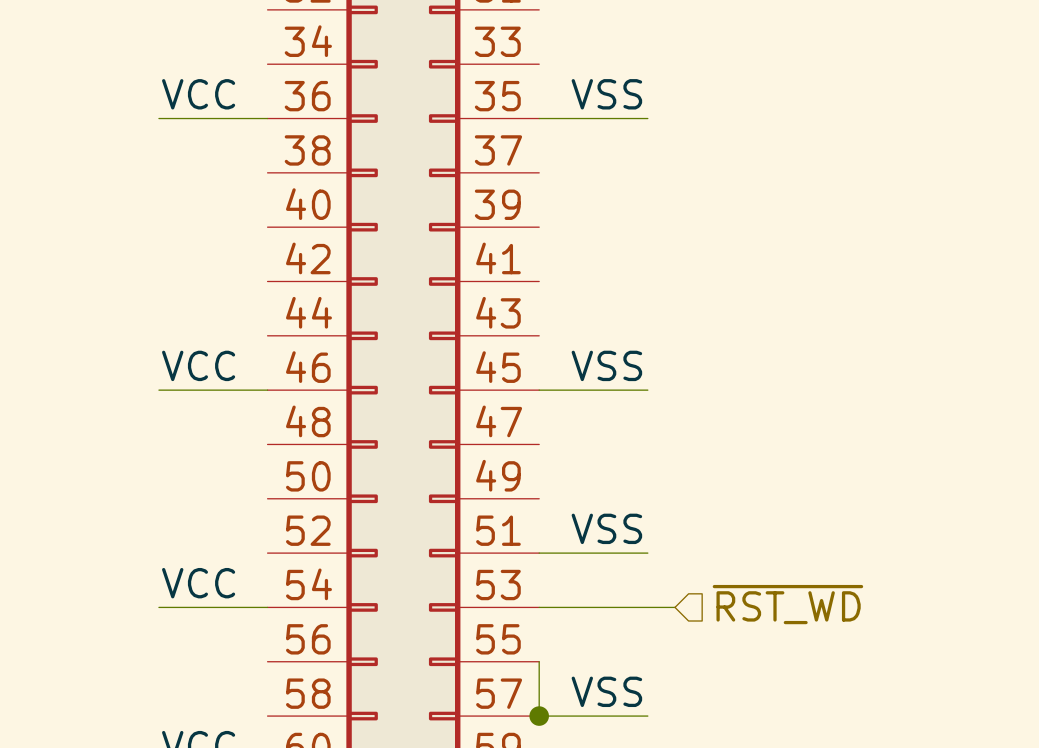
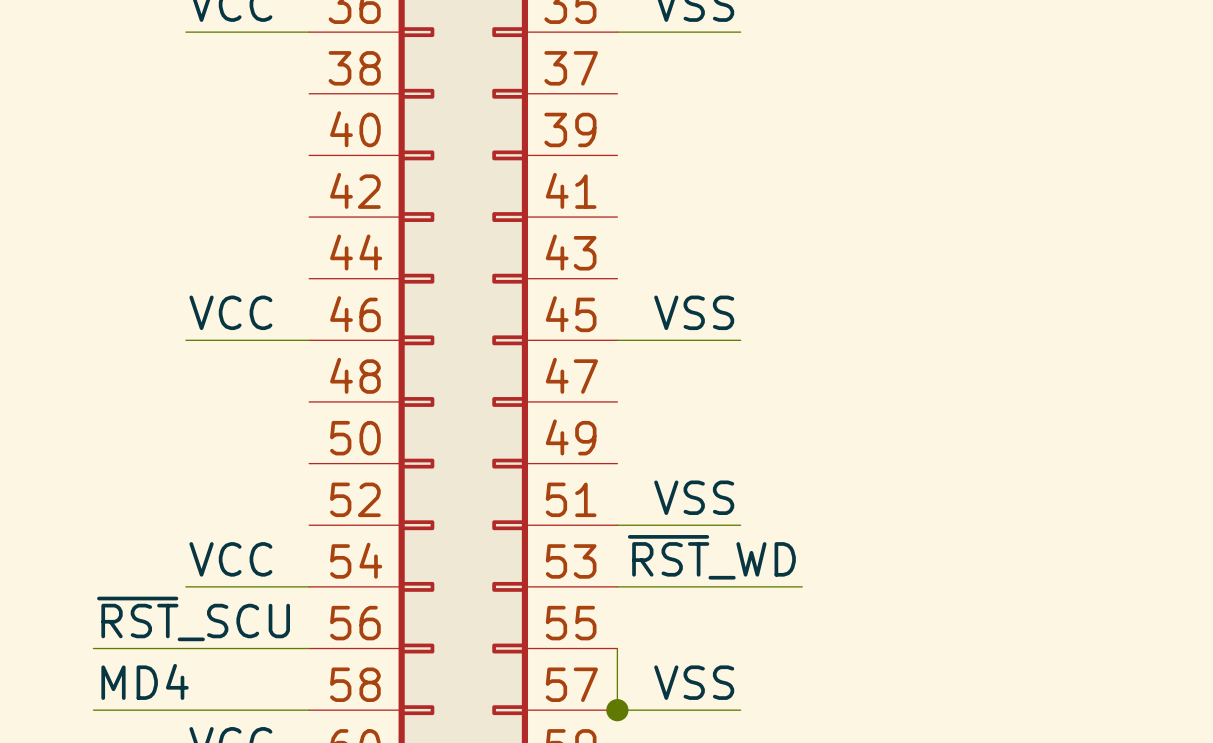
label: none -> ~{RST}_WD (711, 557)
hierarchical label: ~{RST_WD} (787, 604) -> none
wire: none -> (771, 586) (802, 586)
label: none -> ~{RST}_SCU (193, 618)
wire: none -> (93, 648) (309, 648)
label: none -> MD4 (145, 681)
wire: none -> (93, 710) (309, 710)

